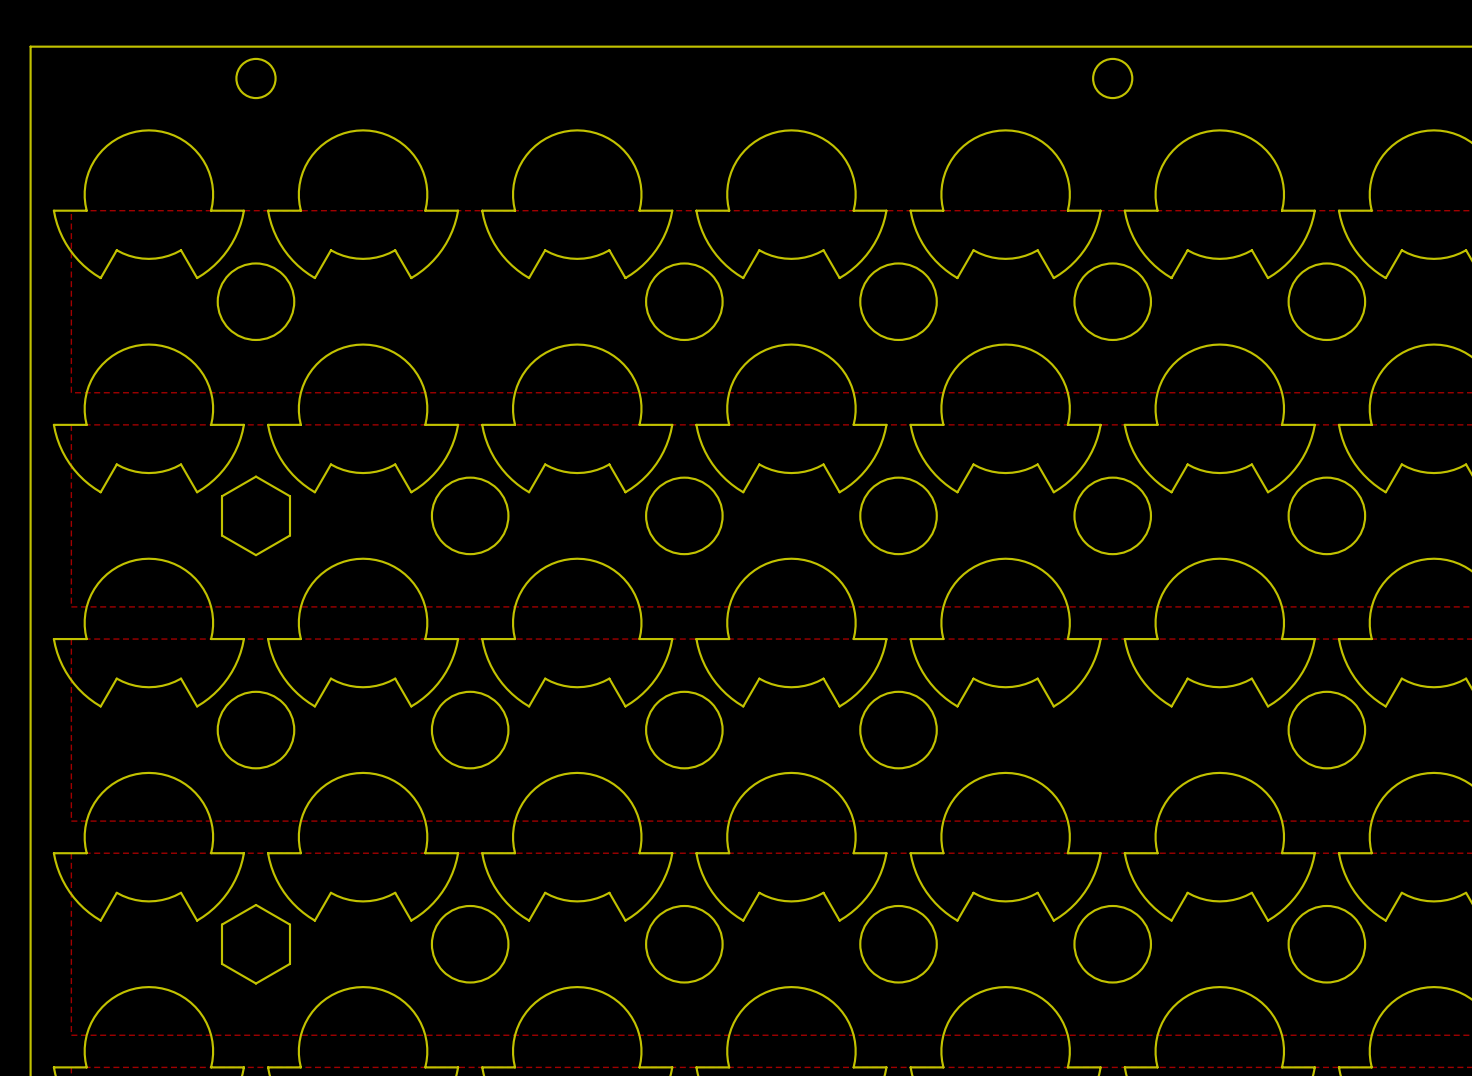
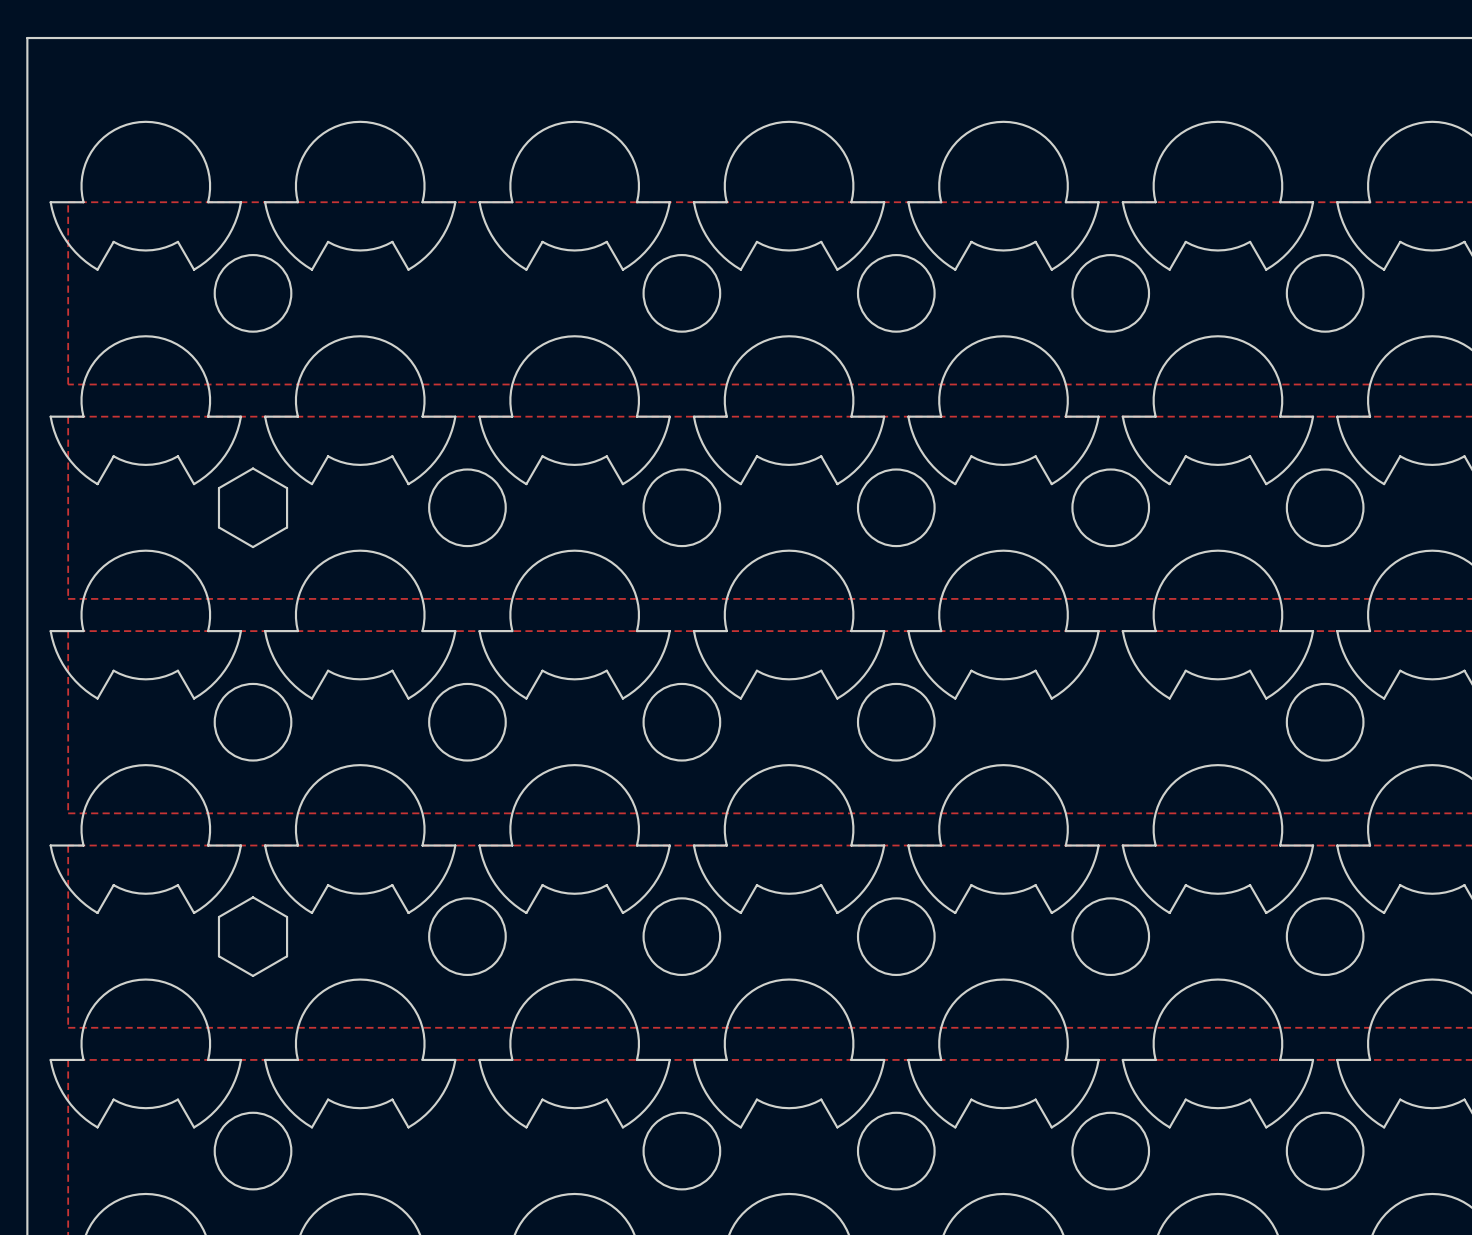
round board edge: [235, 57, 277, 100] -> none
round board edge: [1092, 57, 1134, 100] -> none

